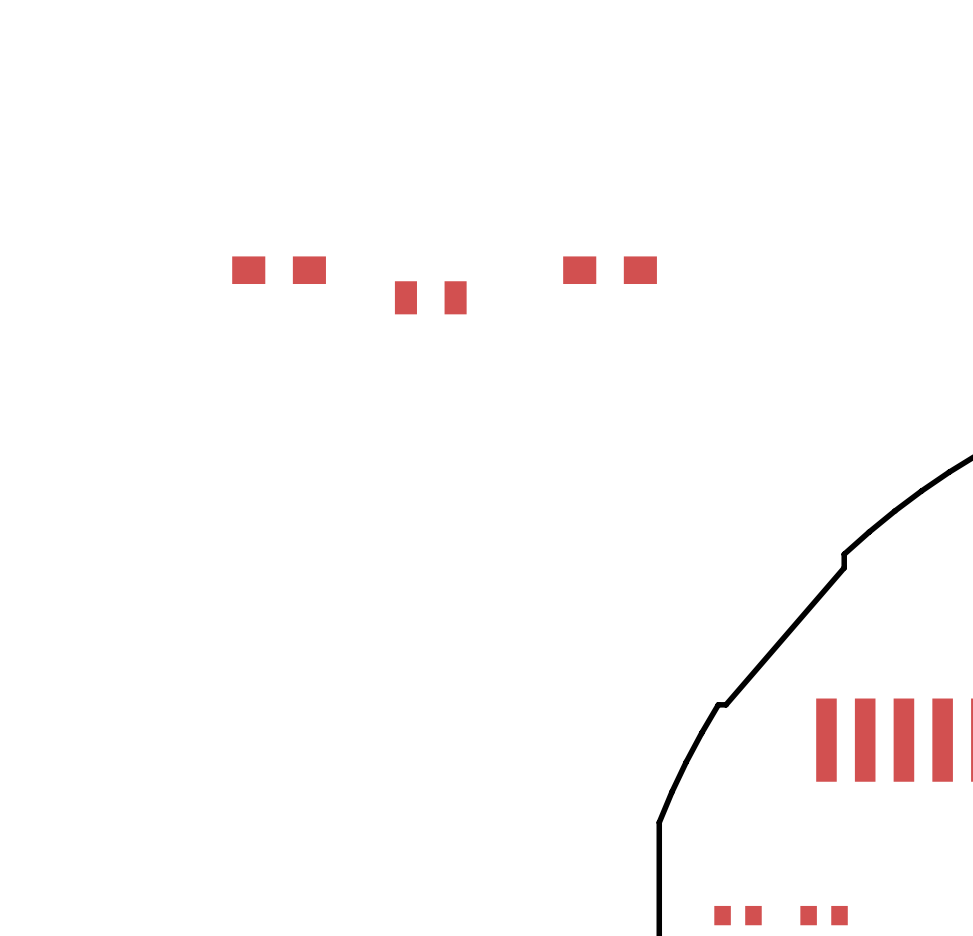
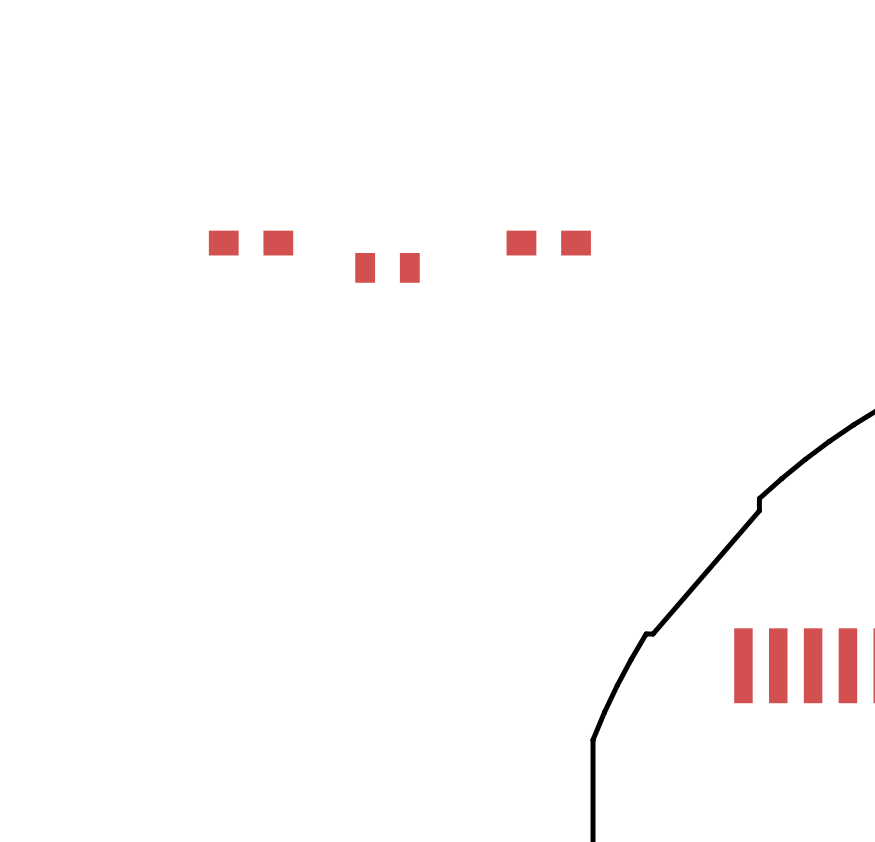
part: (738, 915) -> none
part: (824, 915) -> none

